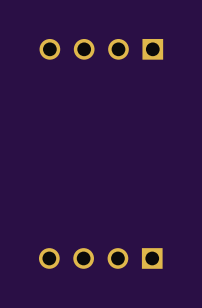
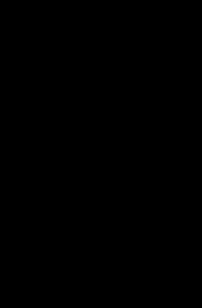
part: (101, 49) -> none
part: (100, 258) -> none

